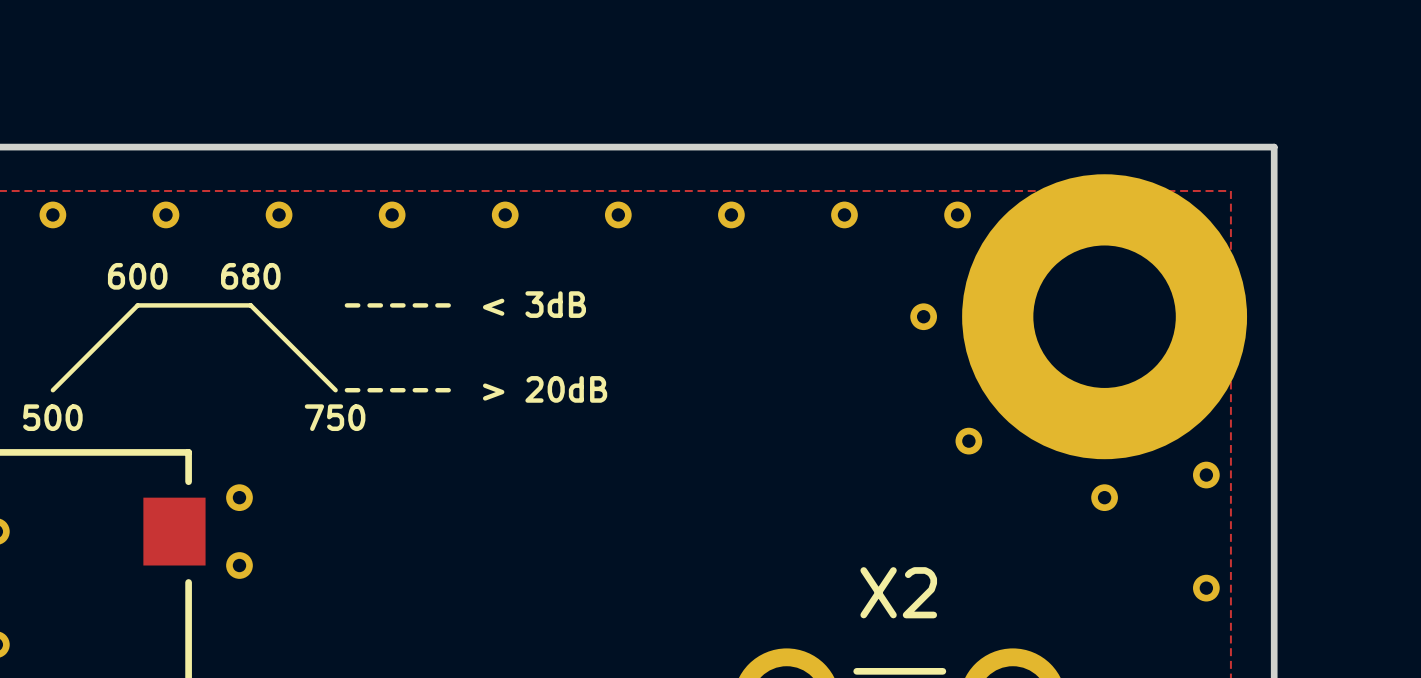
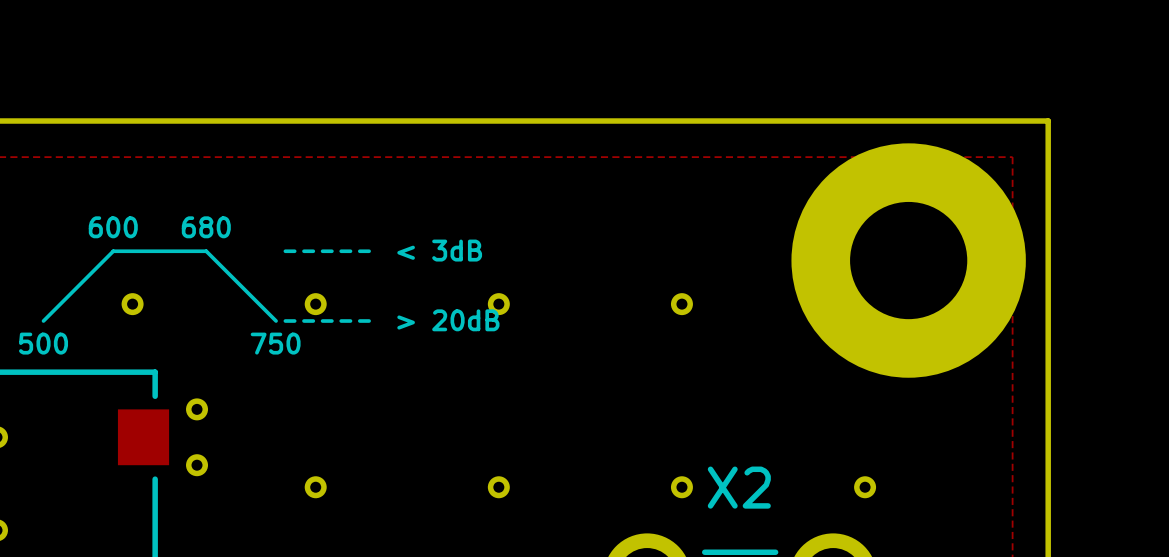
part: (52, 214) -> none
part: (165, 214) -> none
part: (279, 214) -> none
part: (392, 214) -> none
part: (505, 214) -> none
part: (618, 214) -> none
part: (731, 214) -> none
part: (844, 214) -> none
part: (957, 214) -> none
part: (923, 316) -> none
part: none -> (132, 304)
part: none -> (315, 304)
part: none -> (498, 304)
part: none -> (681, 304)
part: (968, 441) -> none
part: (1206, 475) -> none
part: (1104, 497) -> none
part: (1206, 588) -> none
part: none -> (315, 487)
part: none -> (498, 487)
part: none -> (681, 487)
part: none -> (865, 487)

